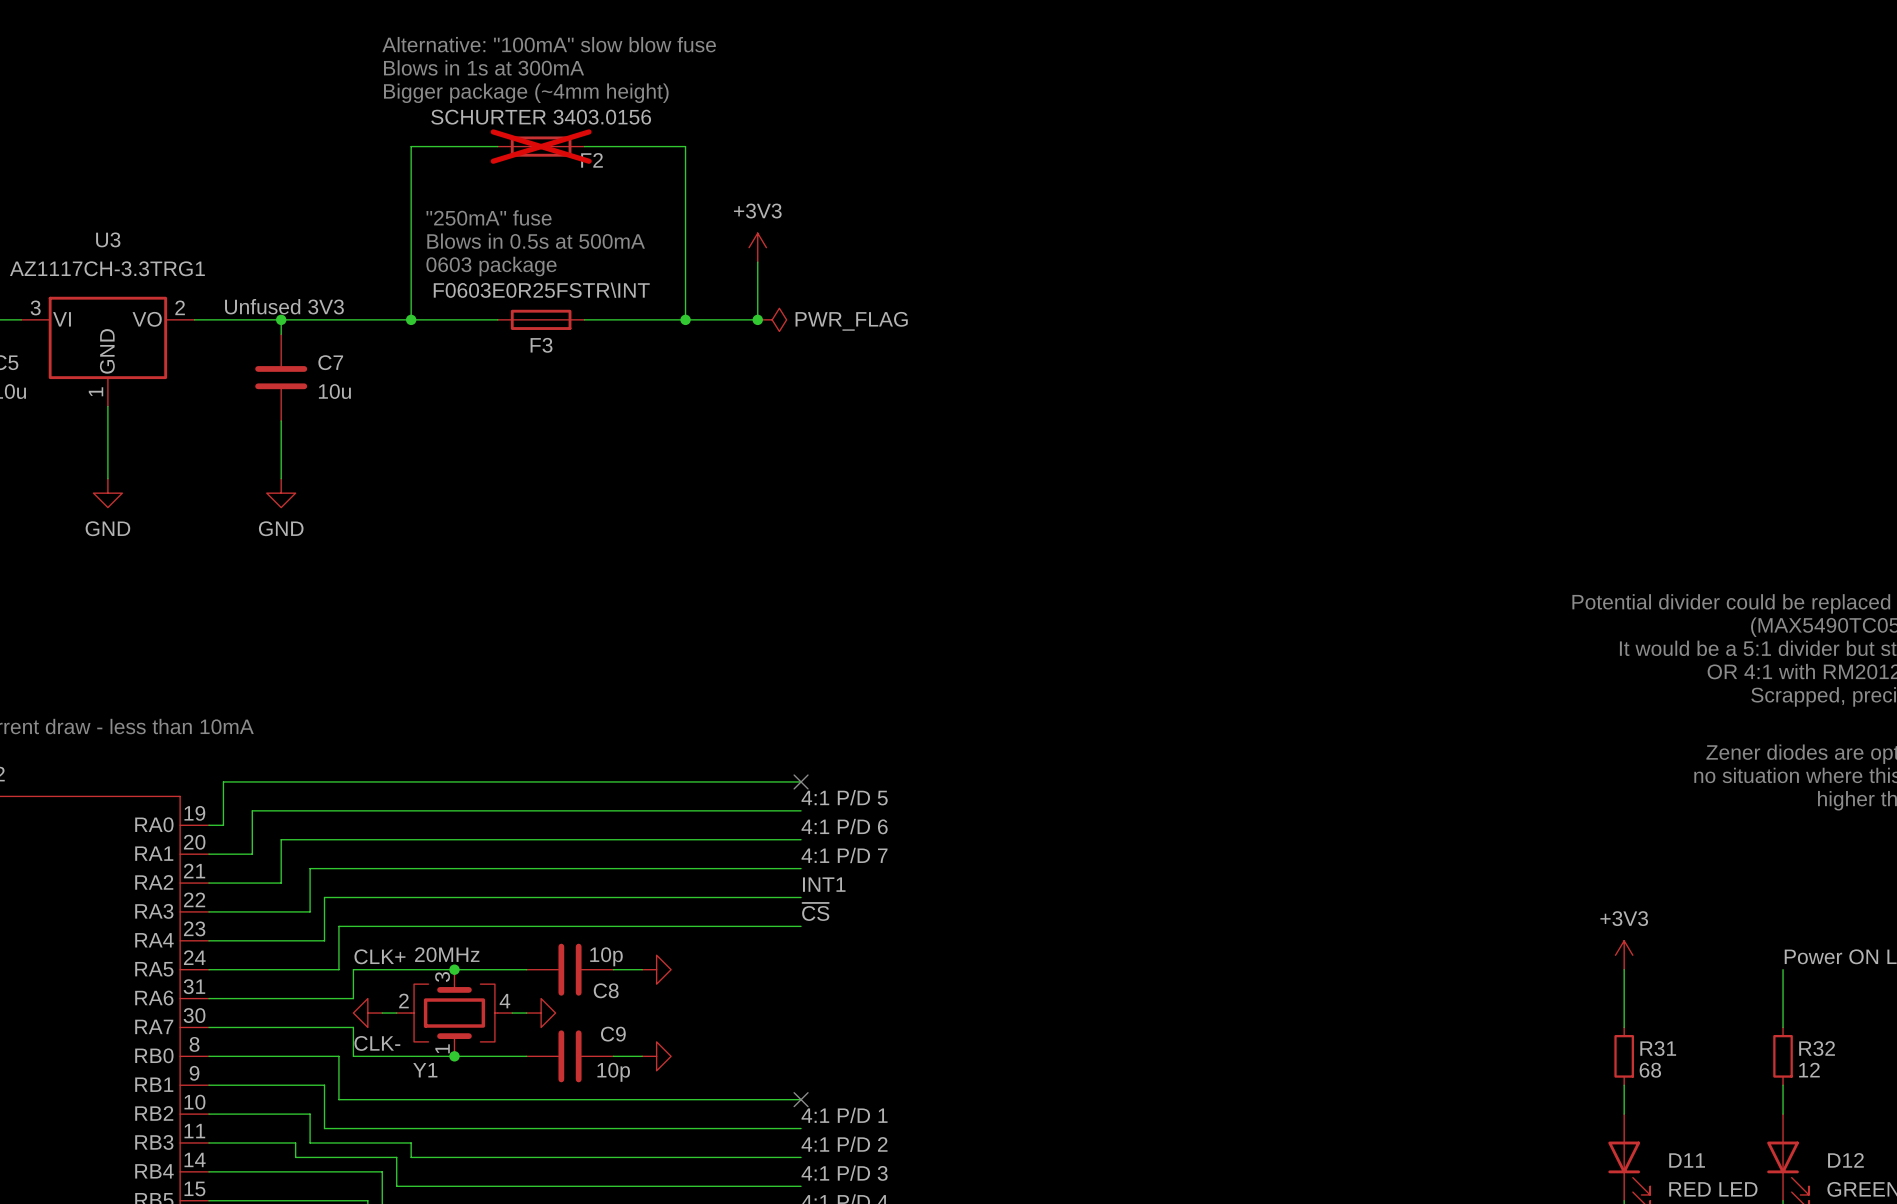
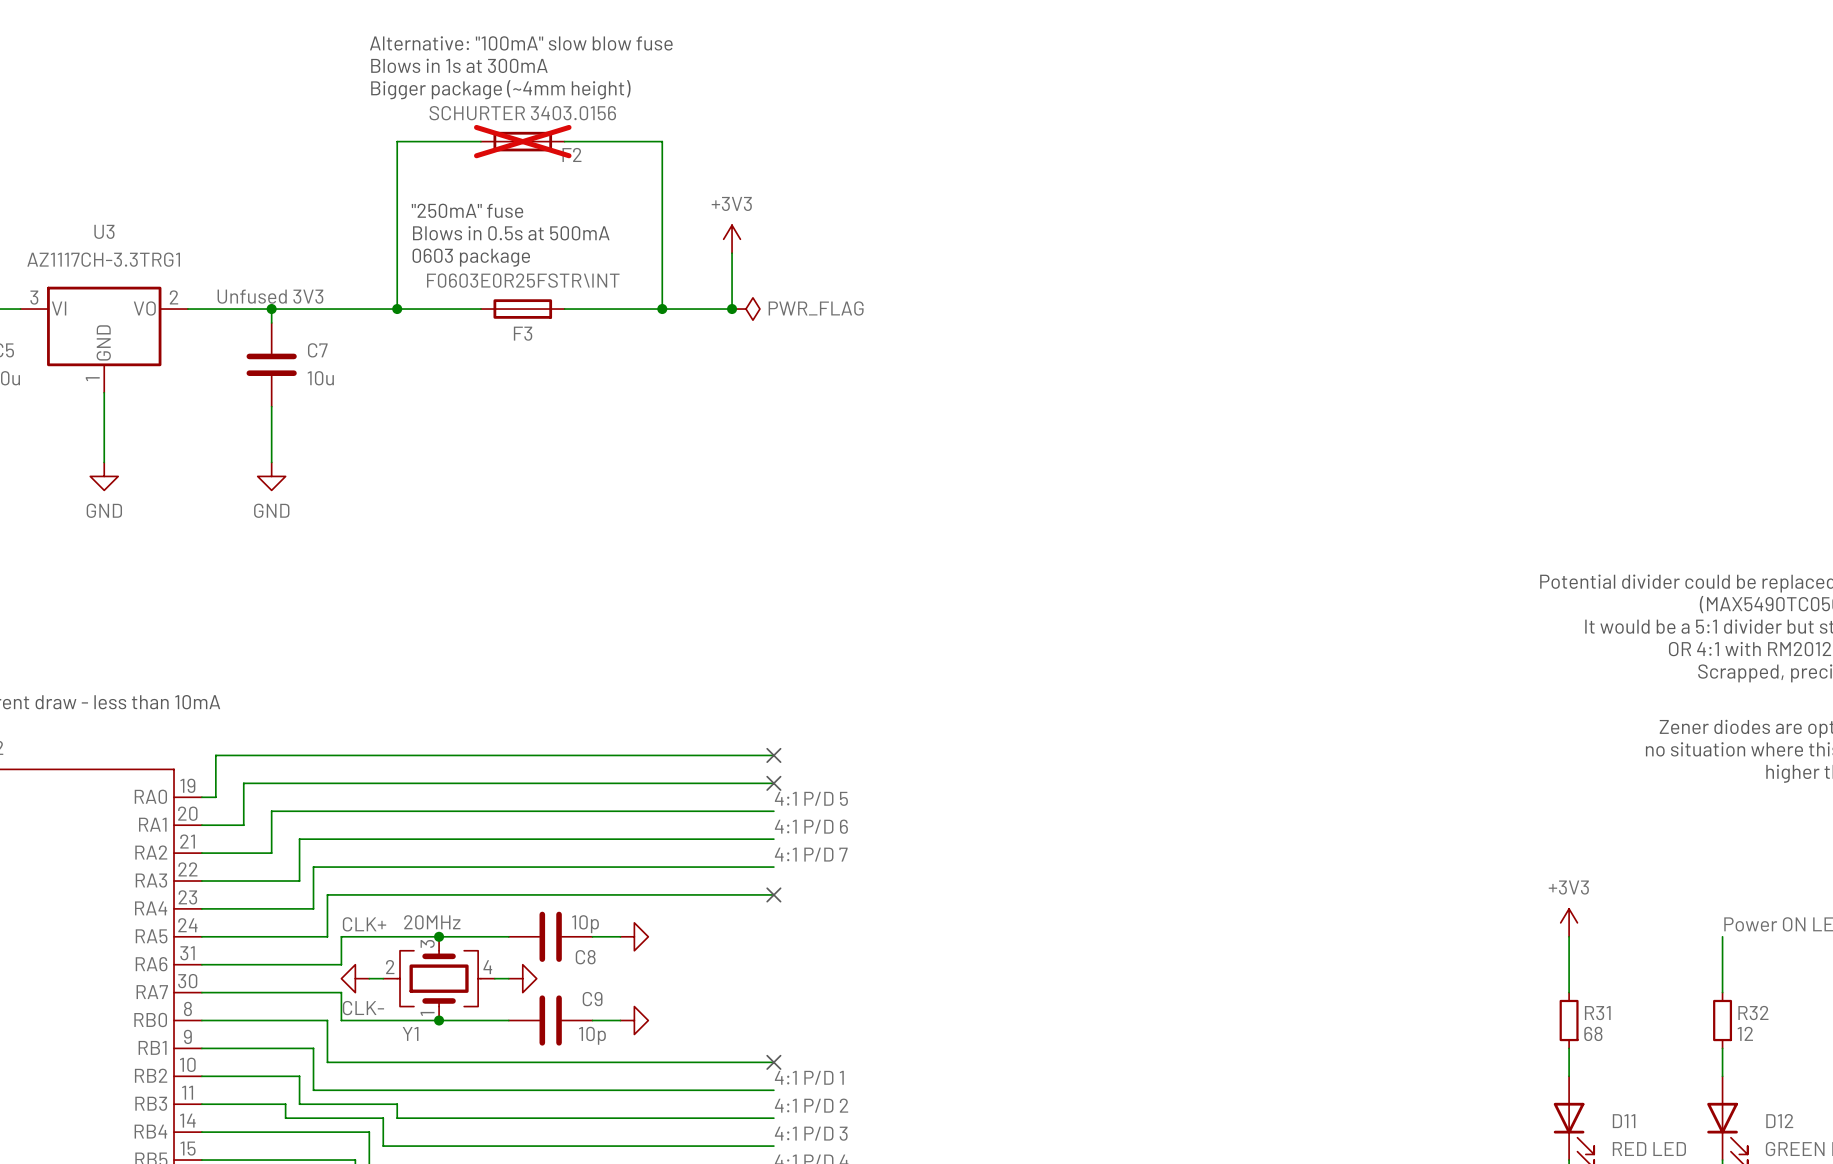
label: 4:1 P/D 5 (844, 797) -> none
no-connect mark: none -> (773, 783)
label: 4:1 P/D 6 (844, 826) -> 4:1 P/D 5 (811, 798)
label: 4:1 P/D 7 (844, 855) -> 4:1 P/D 6 (811, 826)
label: INT1 (824, 884) -> 4:1 P/D 7 (811, 854)
label: ~{CS} (815, 911) -> none
no-connect mark: none -> (773, 894)

